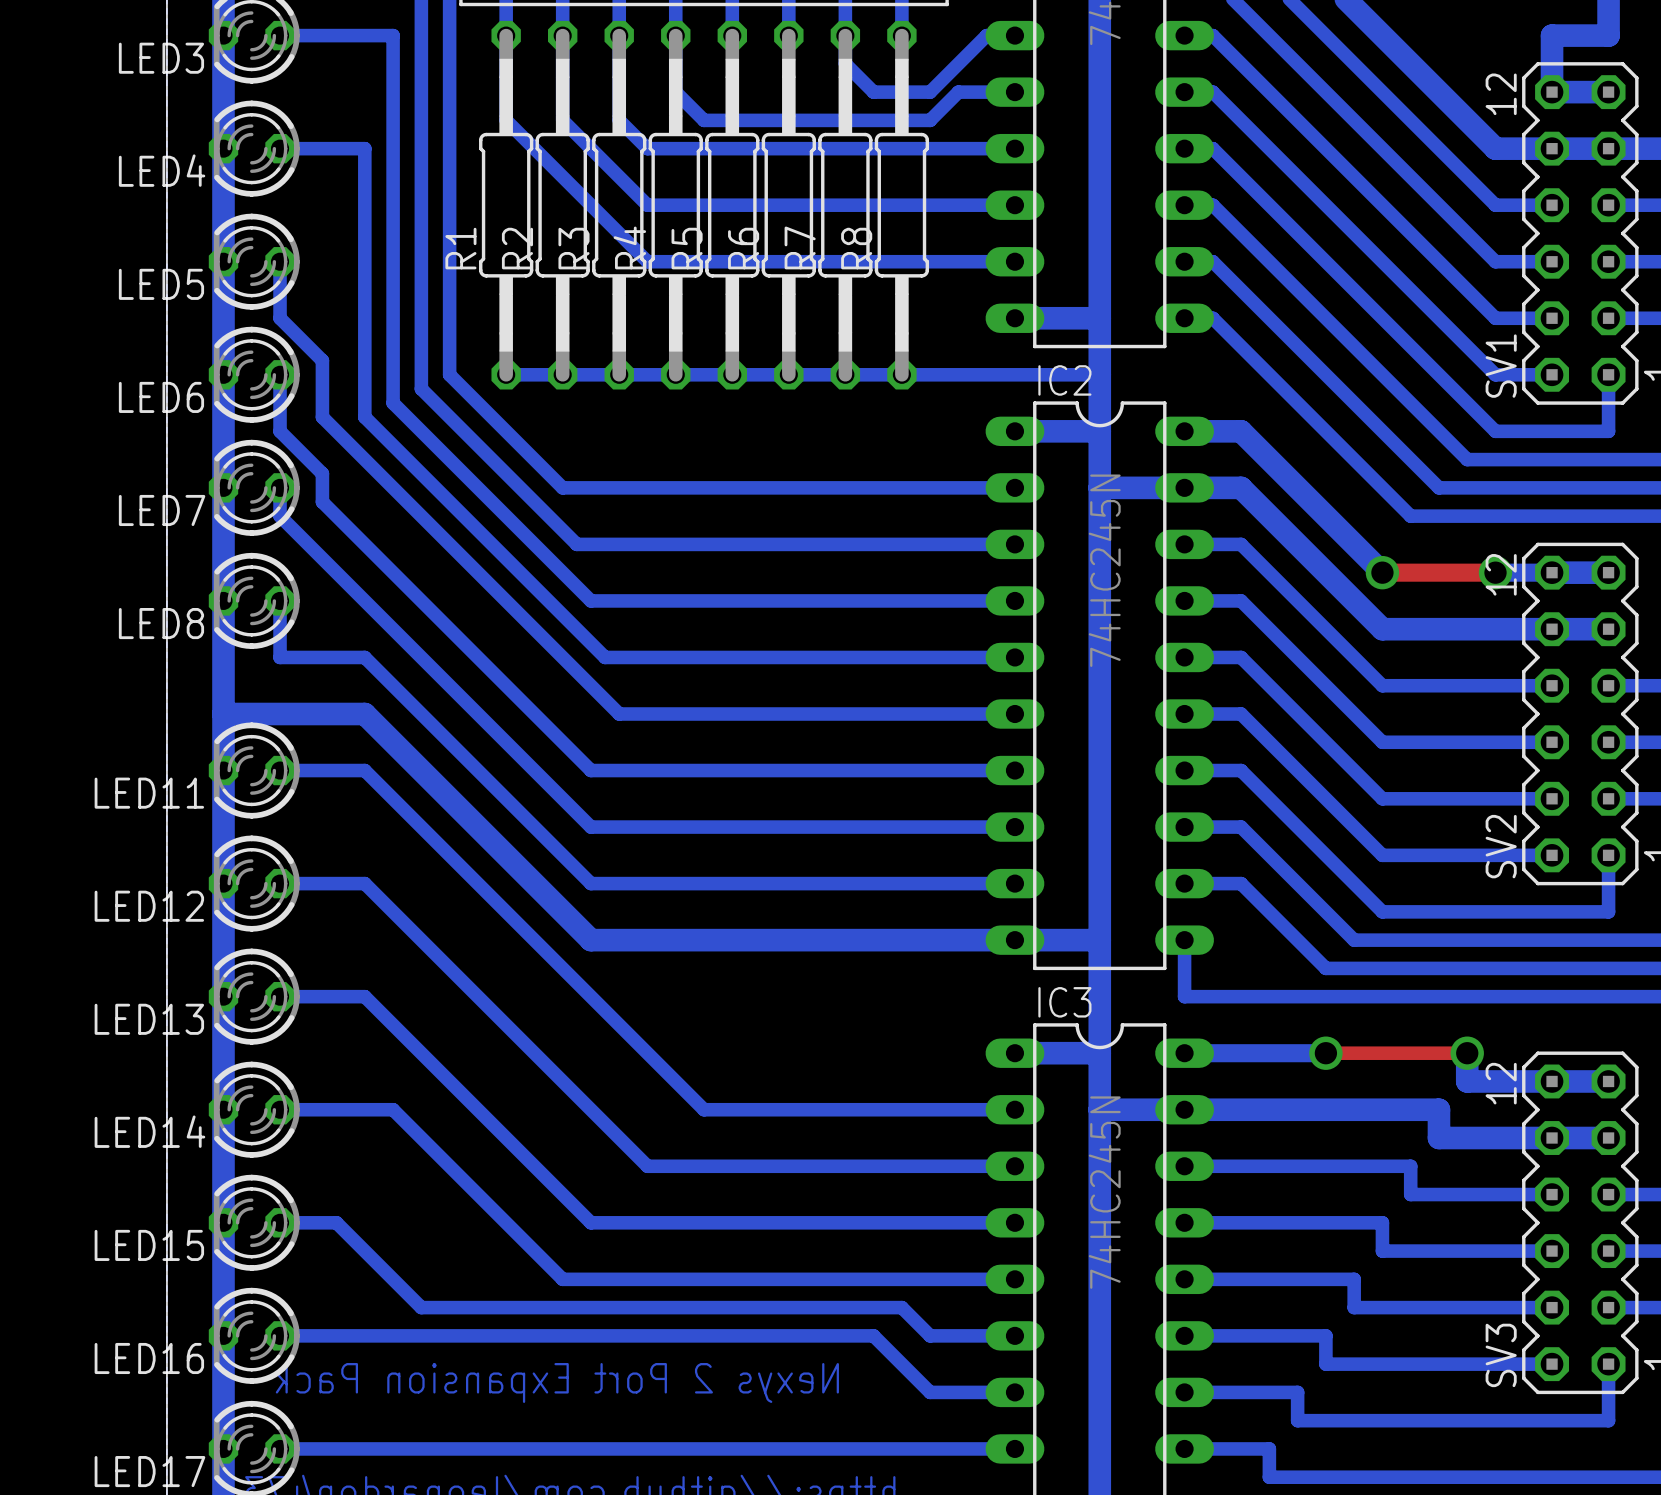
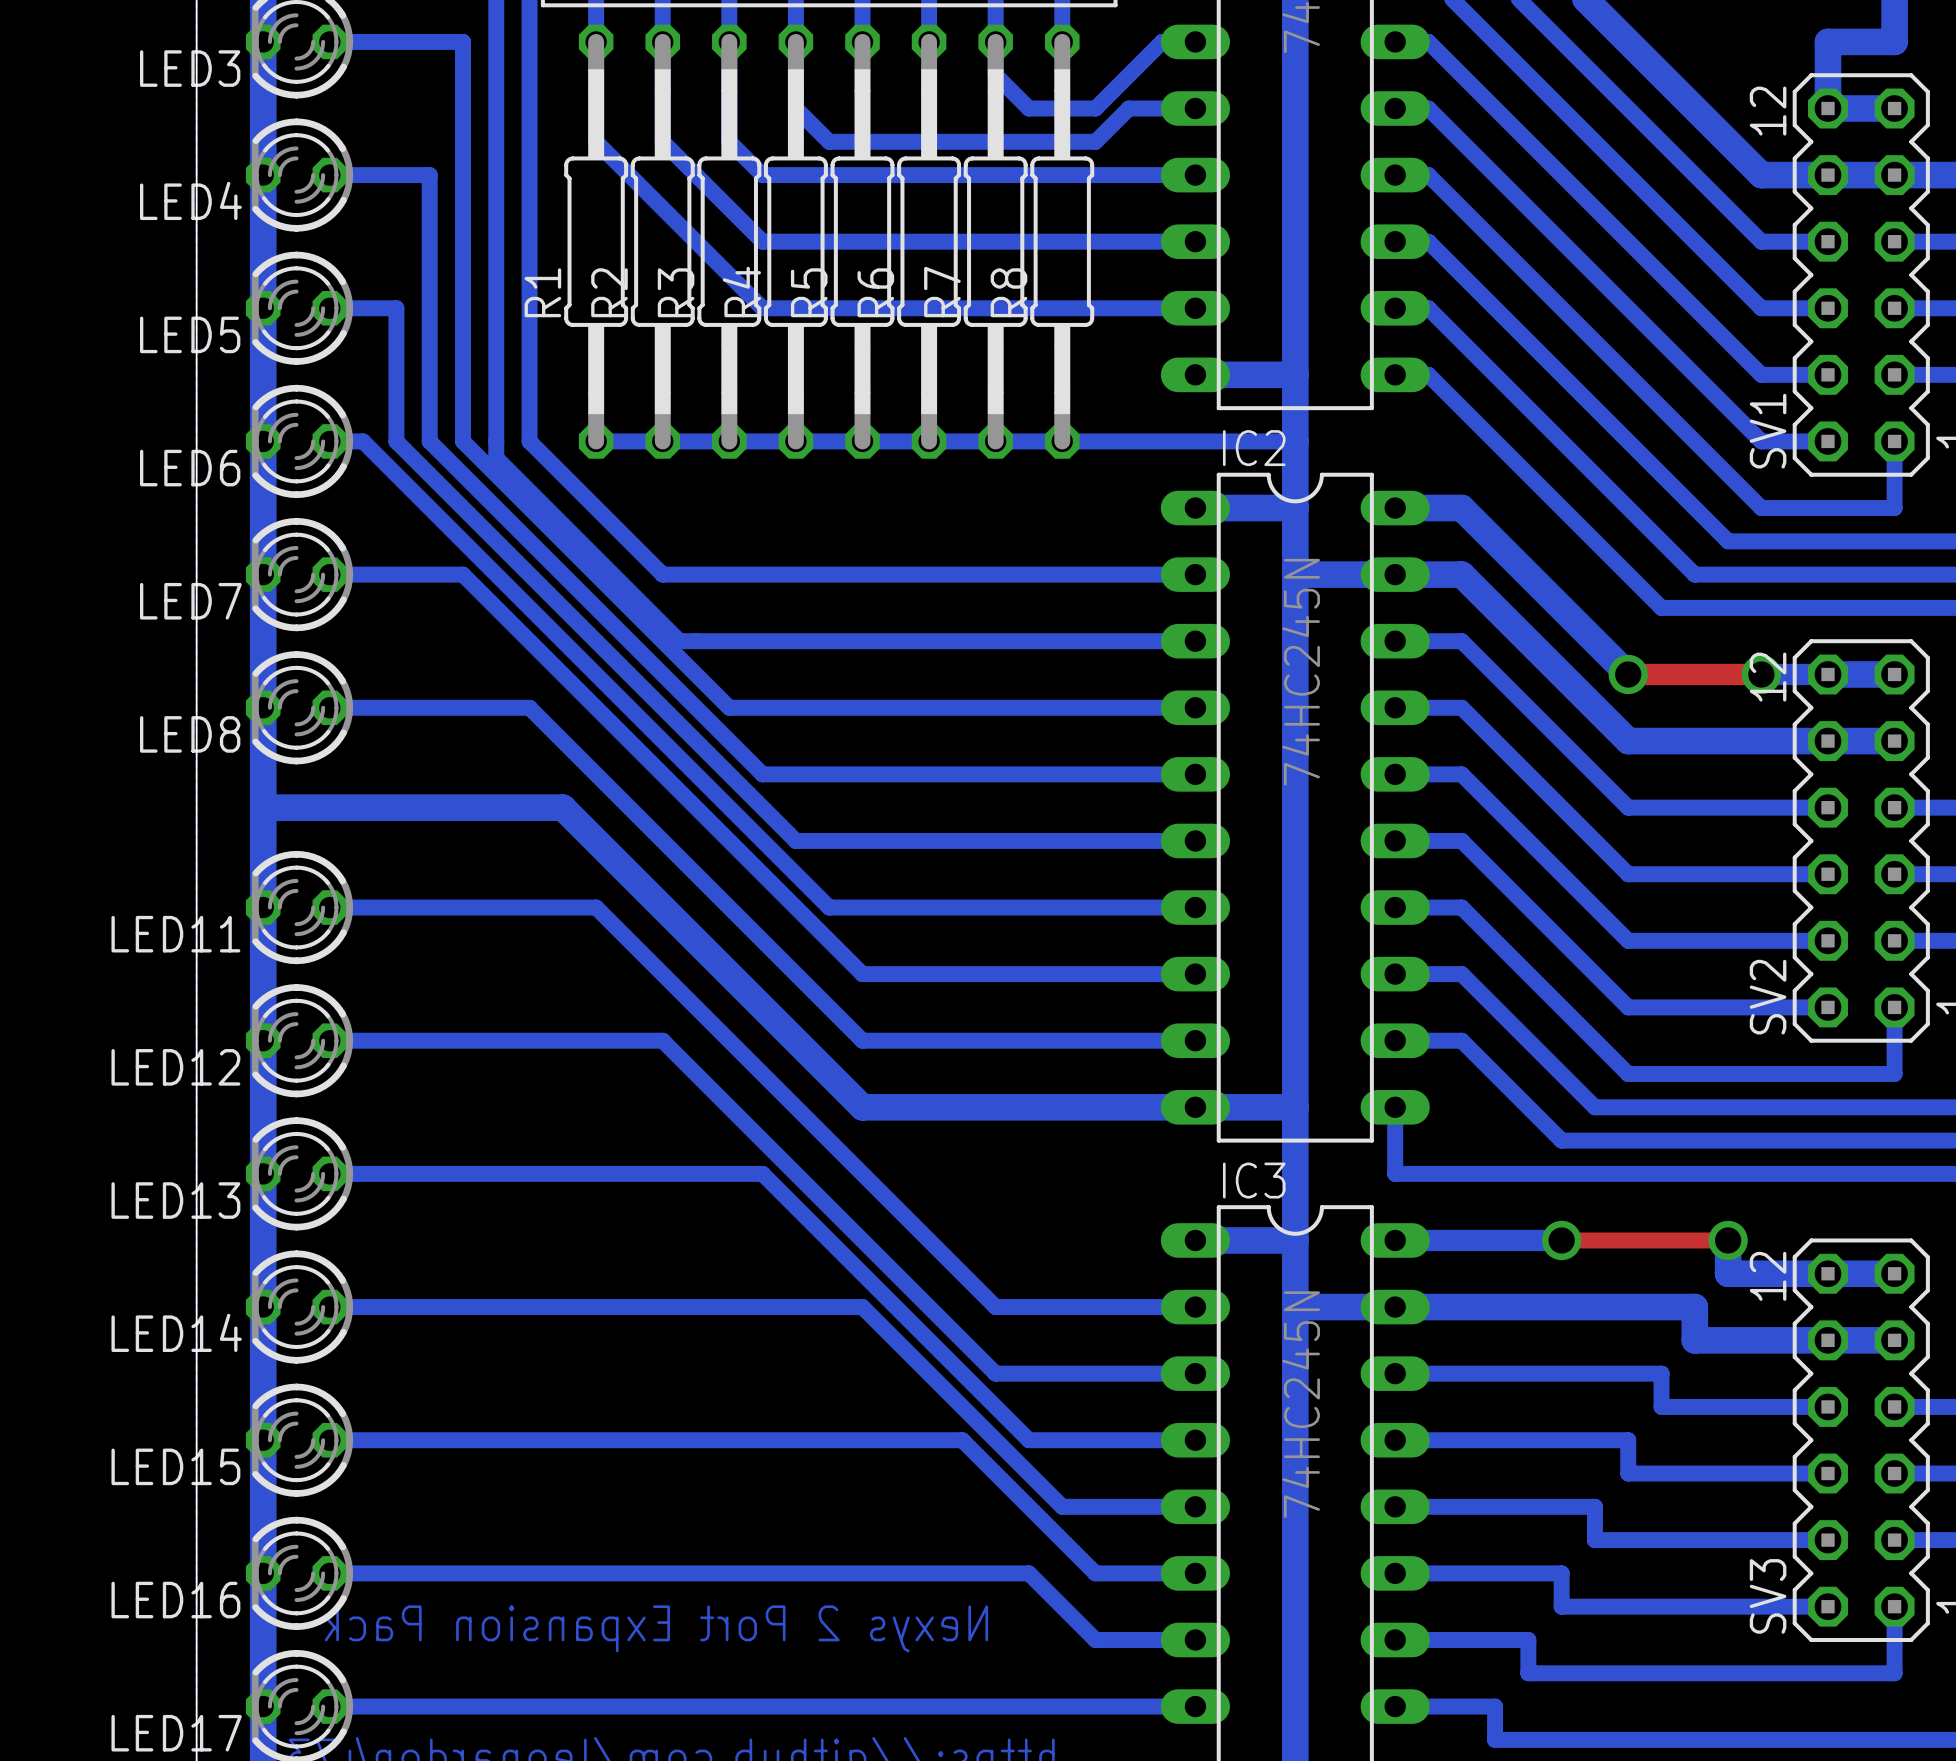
bottom track: (280, 261) (280, 318) (322, 360) (322, 417) (393, 487) -> (329, 574) (462, 574)
bottom track: none -> (329, 308) (396, 308) (396, 441) (795, 840)
bottom track: (280, 374) (280, 431) (322, 473) (322, 502) (590, 770) (704, 770) -> (329, 441) (363, 441) (829, 907)
bottom track: (364, 374) (364, 417) (605, 657) (647, 657) -> none
bottom track: (393, 374) (393, 403) -> (429, 441) (462, 474)
bottom track: none -> (462, 441) (729, 707)
bottom track: (280, 487) (280, 516) (590, 827) (732, 827) -> none
bottom track: (280, 600) (280, 657) (364, 657) (590, 883) (732, 883) -> (329, 707) (529, 707) (862, 1040)
bottom track: (590, 600) (619, 600) -> (696, 707) (762, 774)
bottom track: (223, 714) (364, 714) (590, 940) (732, 940) -> (263, 807) (562, 807) (862, 1107)
bottom track: (619, 714) (675, 714) -> (729, 840) (862, 974)
bottom track: (364, 770) (704, 1109) -> (429, 907) (596, 907) (995, 1307)
bottom track: (364, 883) (647, 1166) (845, 1166) -> (429, 1040) (662, 1040) (995, 1373)
bottom track: (364, 996) (590, 1222) -> (396, 1440) (696, 1440)
bottom track: none -> (429, 1173) (762, 1173) (1028, 1440)
bottom track: (393, 1109) (562, 1279) (901, 1279) -> (462, 1307) (829, 1307)
bottom track: (732, 1109) (845, 1109) -> (862, 1307) (1062, 1506)
bottom track: (336, 1222) (421, 1307) (901, 1307) -> none
bottom track: (817, 1222) (873, 1222) -> (962, 1440) (1062, 1540)

